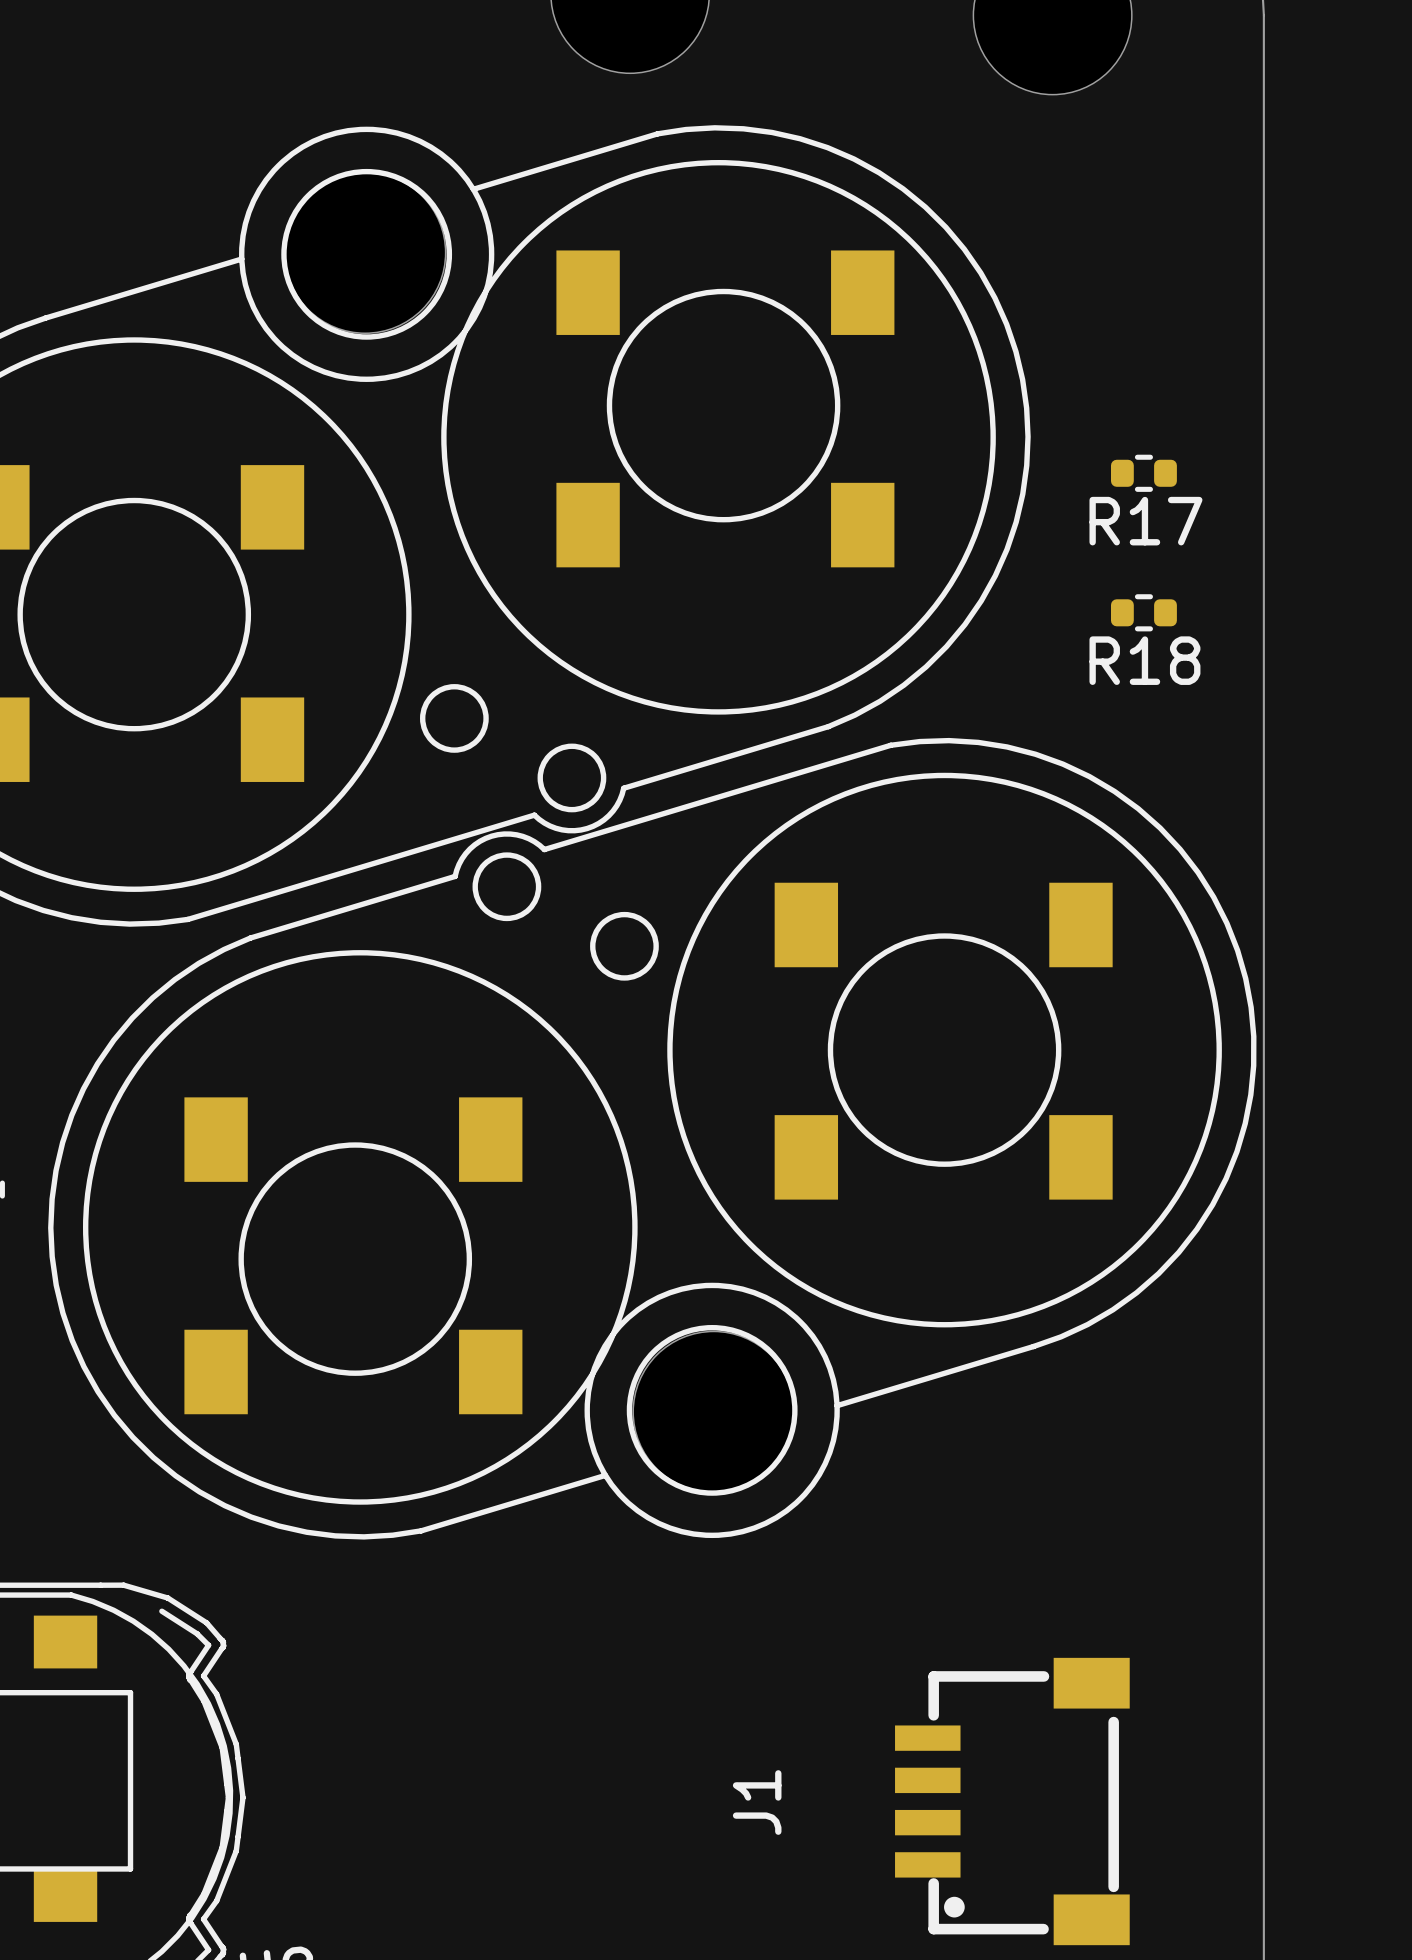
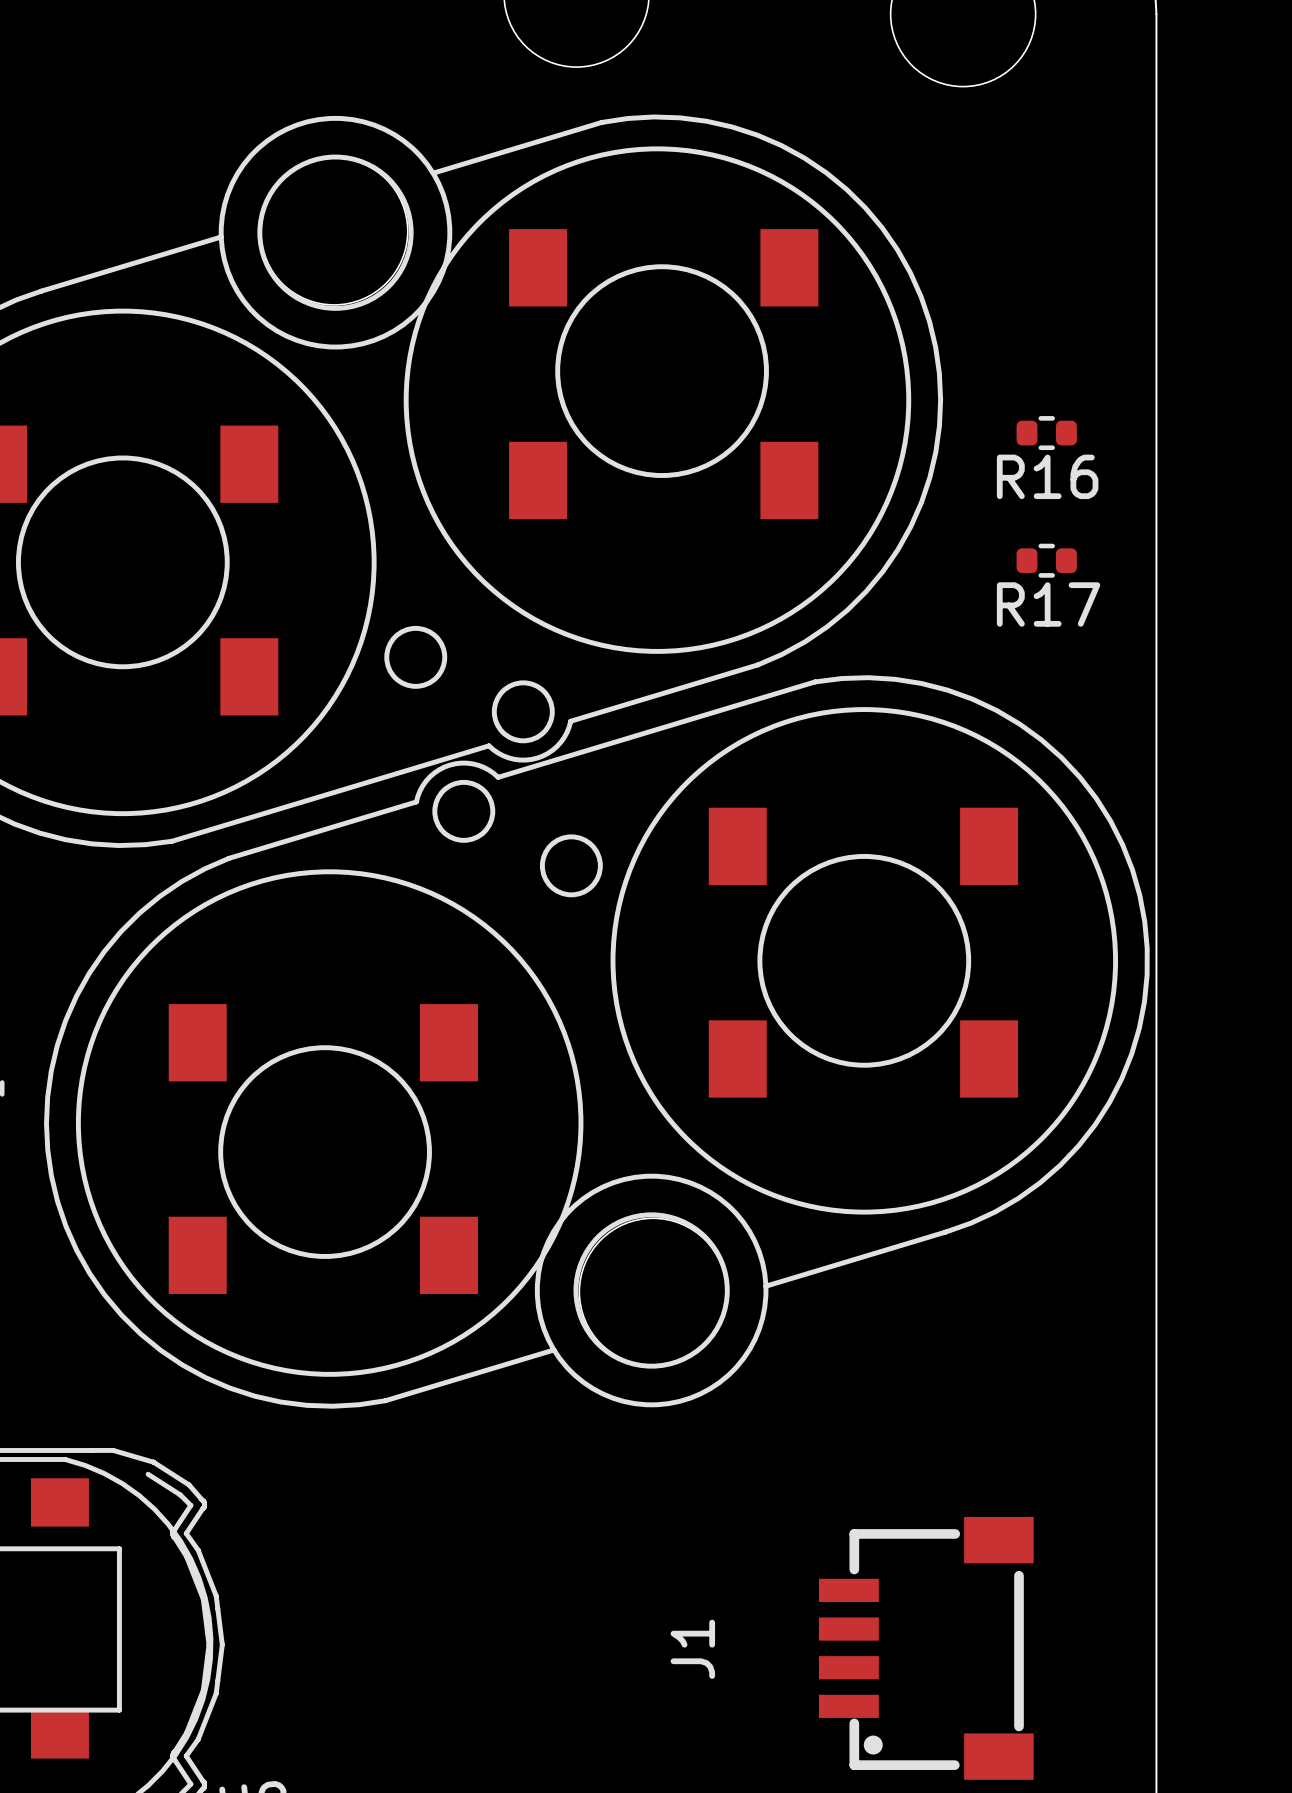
R17 name: R17 (1145, 521) -> R16 (1047, 476)
R18 name: R18 (1144, 660) -> R17 (1048, 604)

